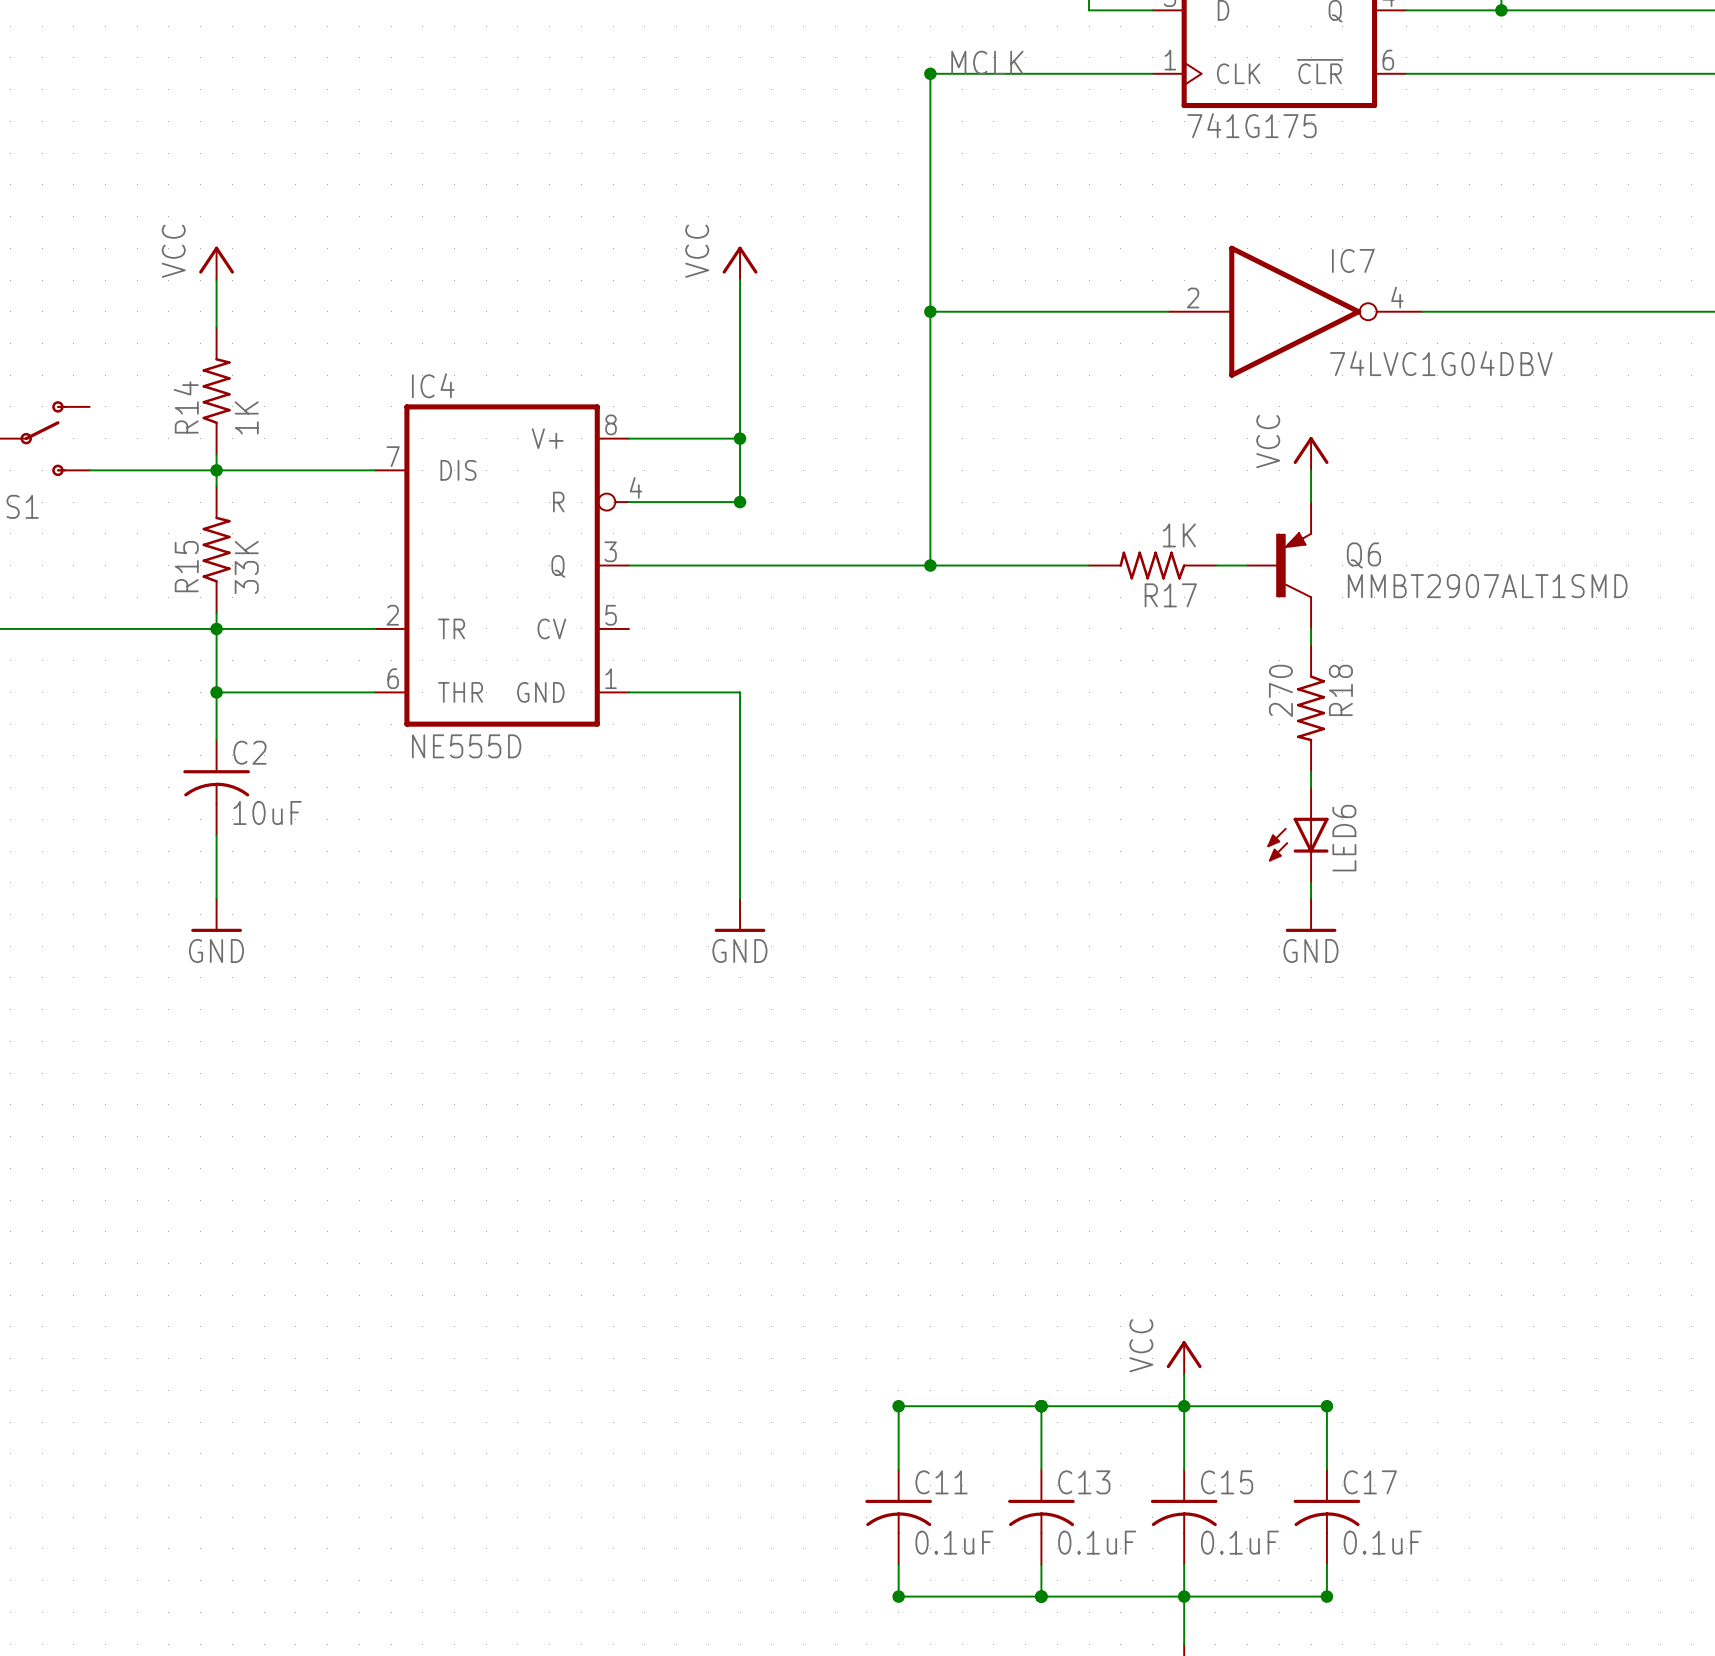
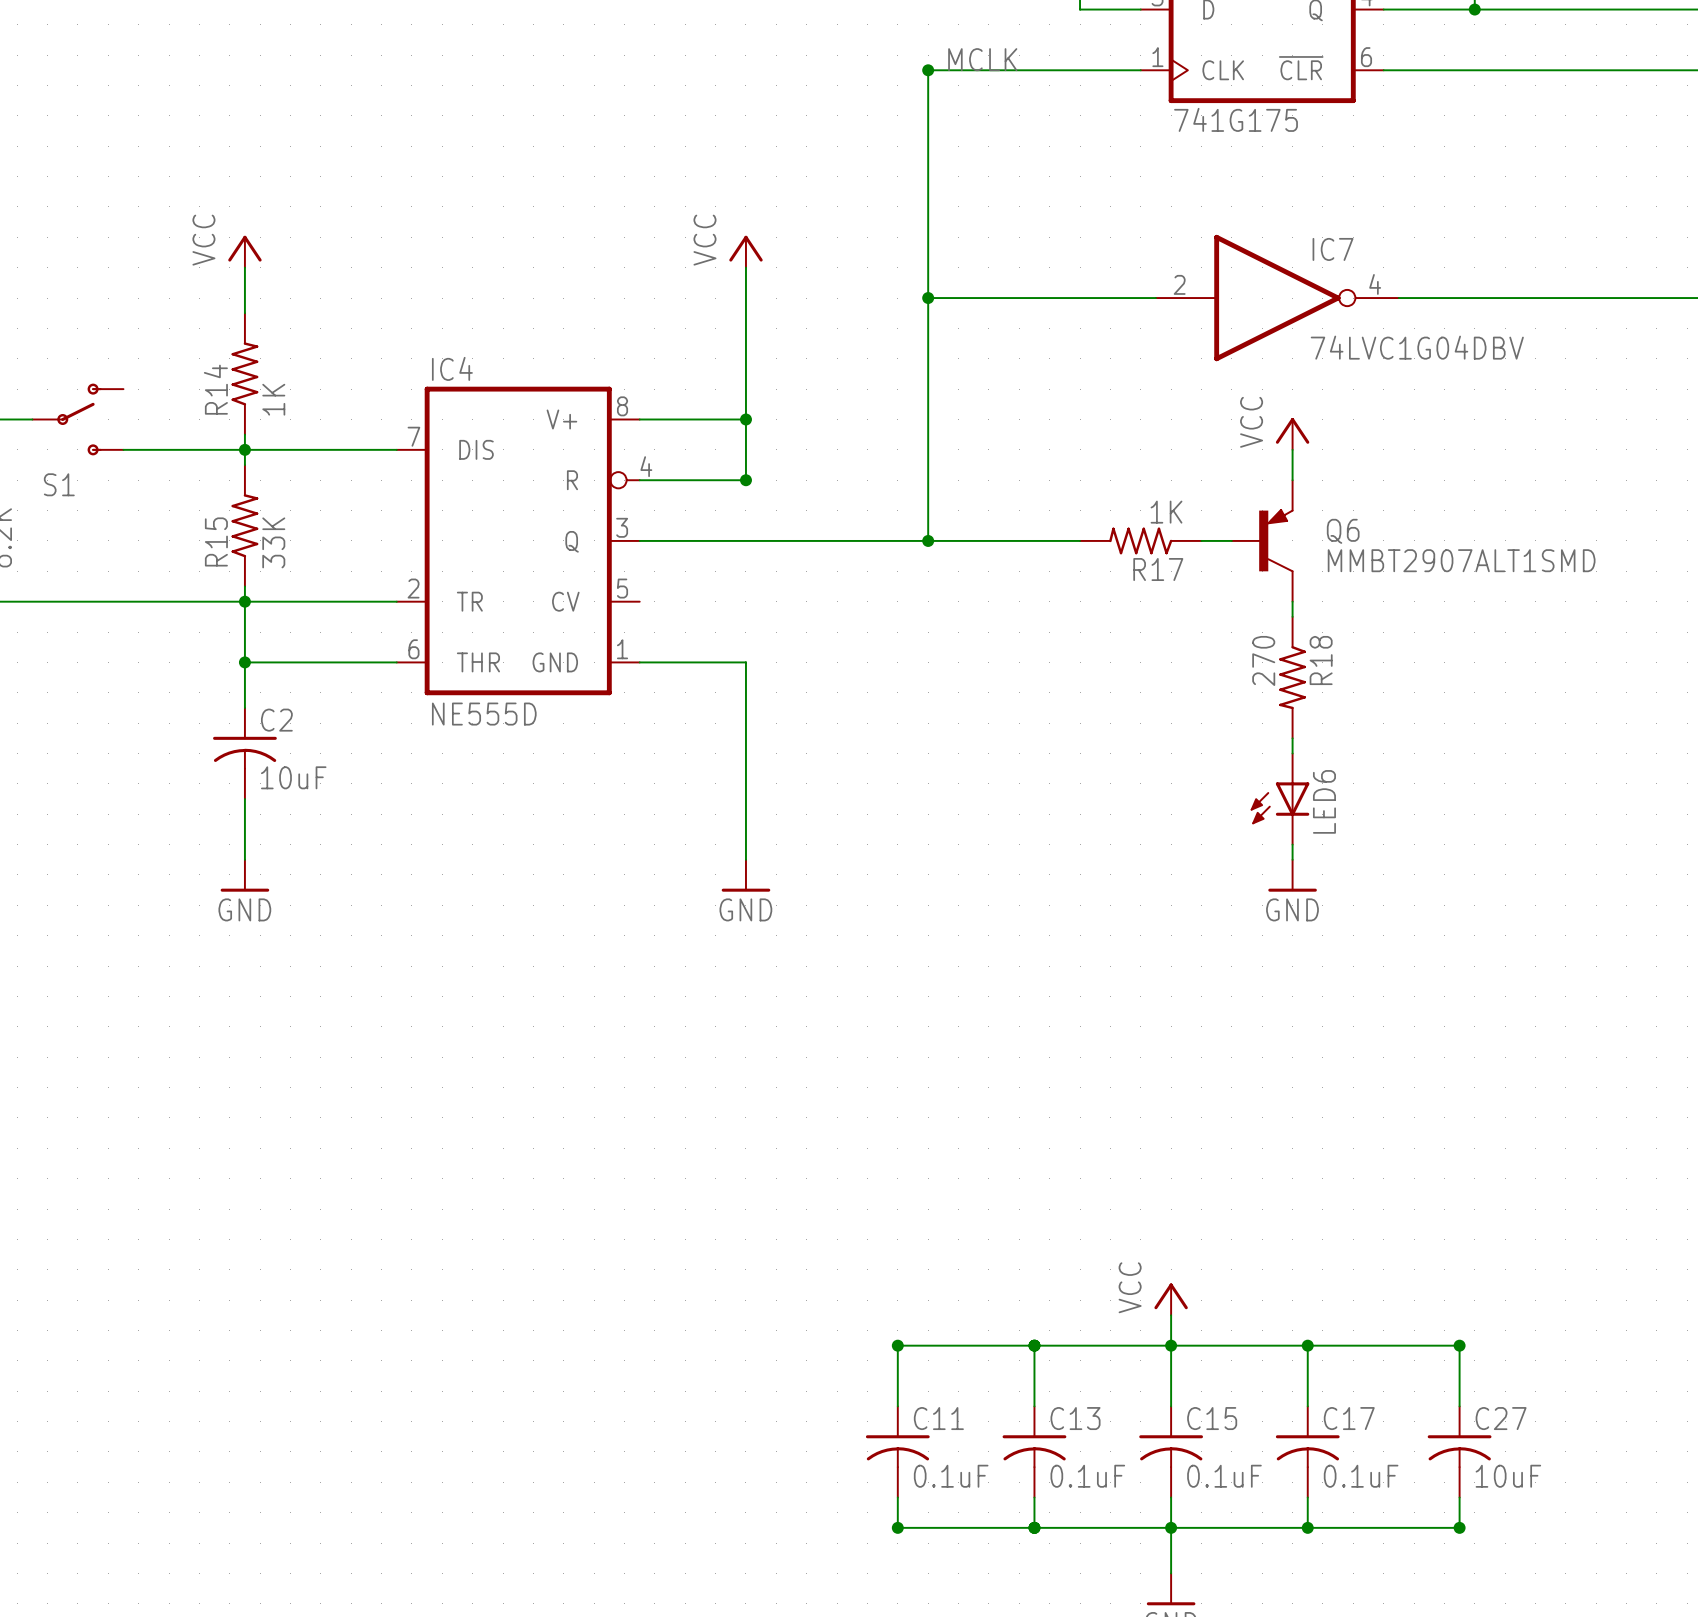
wire: none -> (1307, 1345) (1459, 1345) (1459, 1406)
junction: none -> (1459, 1345)
C27: none -> 10uF (1459, 1451)
wire: none -> (1459, 1497) (1459, 1527) (1307, 1527)
junction: none -> (1459, 1527)

